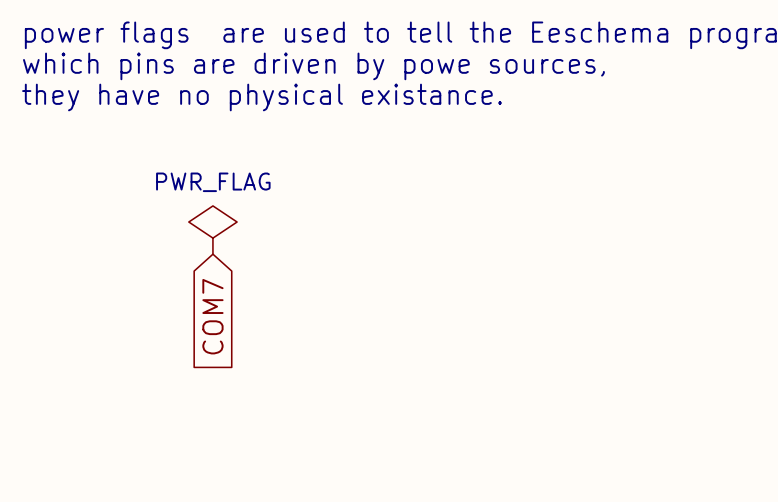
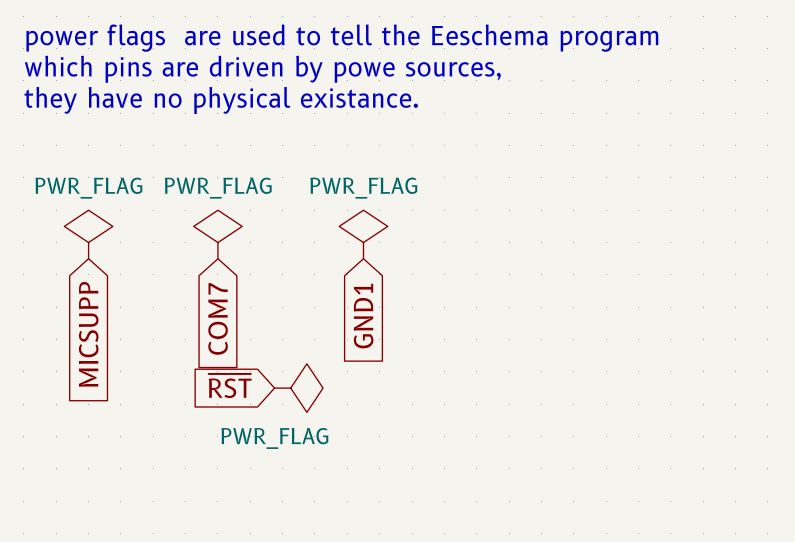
power symbol: none -> PWR_FLAG (88, 234)
power symbol: none -> PWR_FLAG (363, 234)
global label: none -> GND1 (363, 316)
global label: none -> MICSUPP (88, 334)
global label: none -> ~{RST} (230, 385)
power symbol: none -> PWR_FLAG (298, 388)

